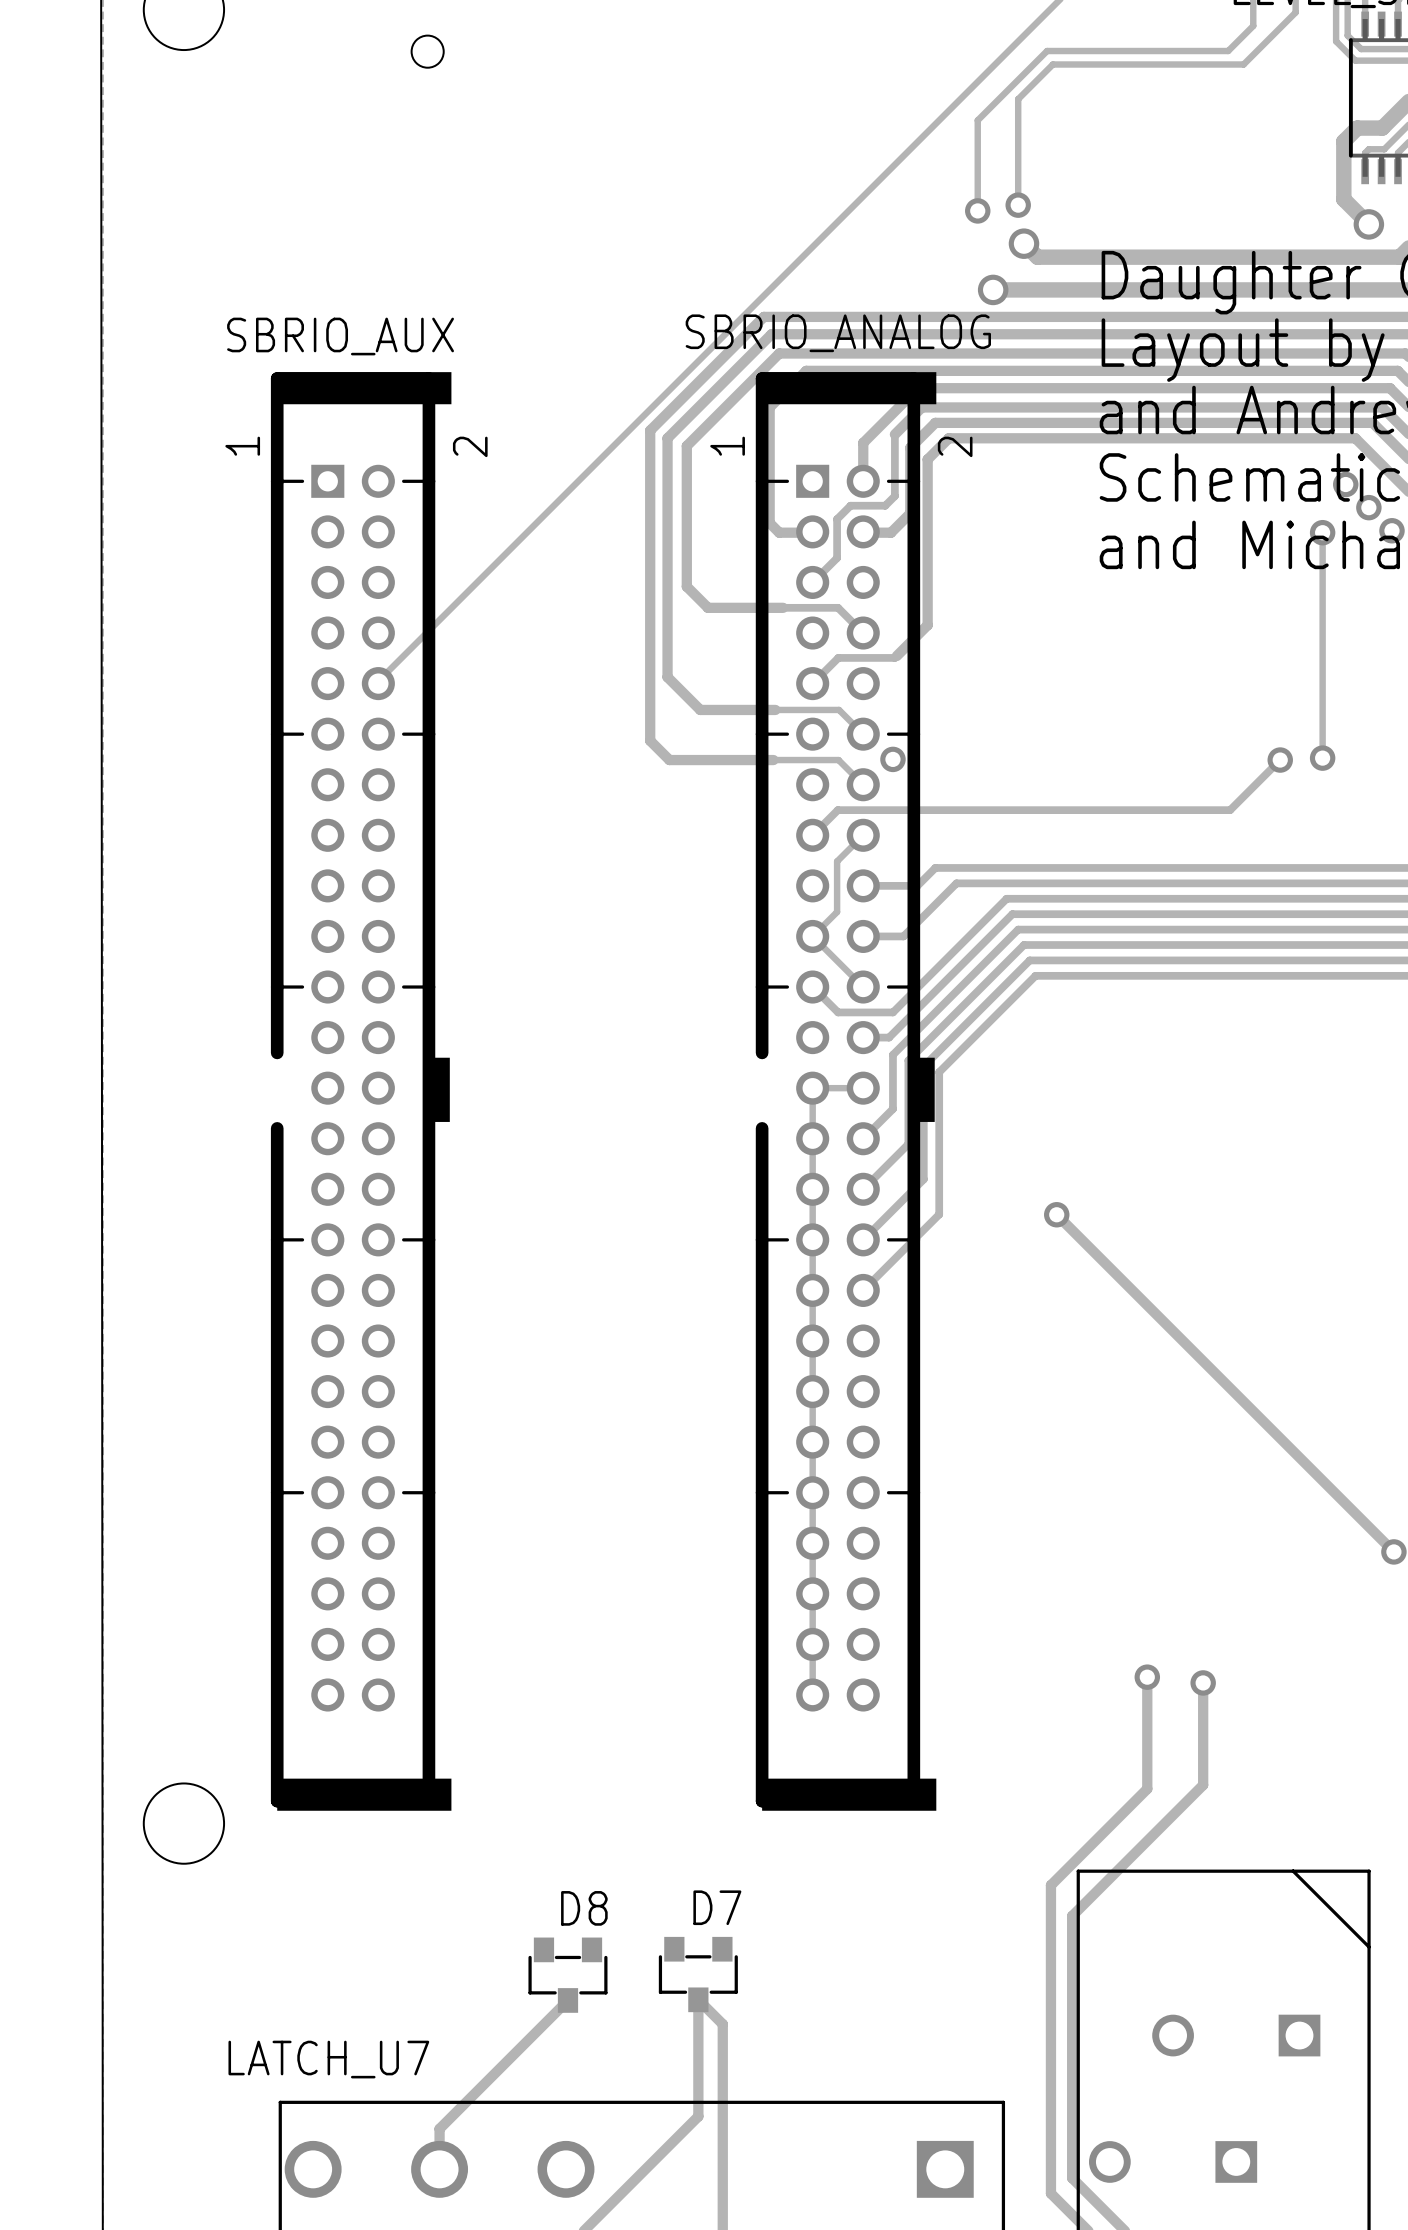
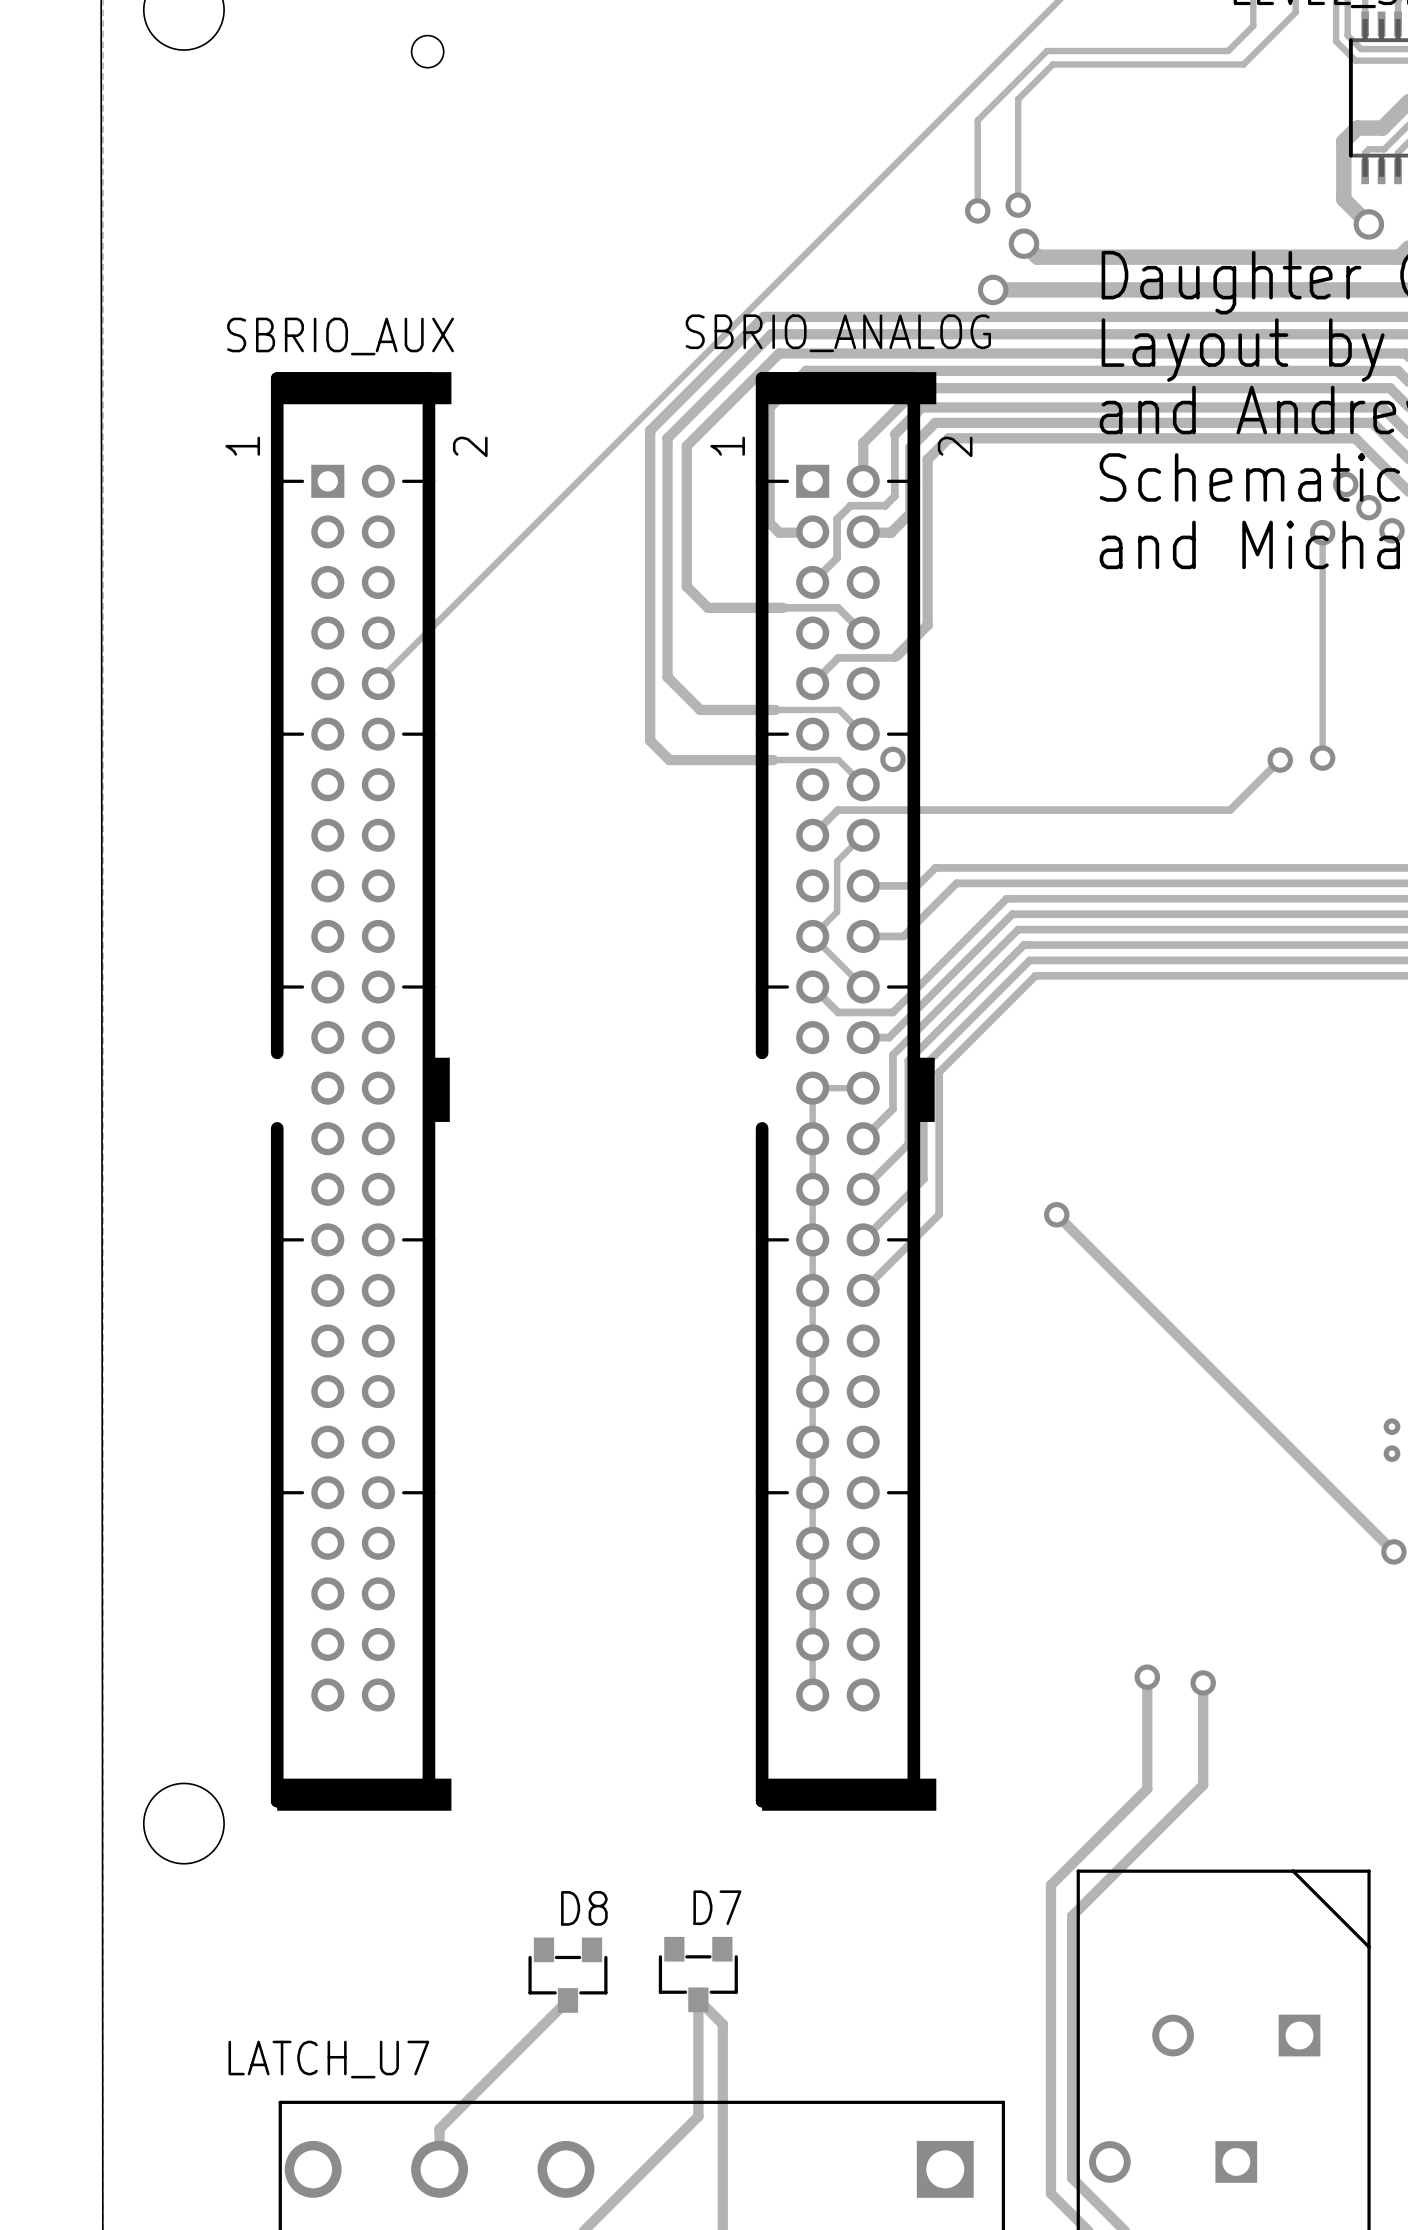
via: none -> (1391, 1426)
via: none -> (1391, 1453)

